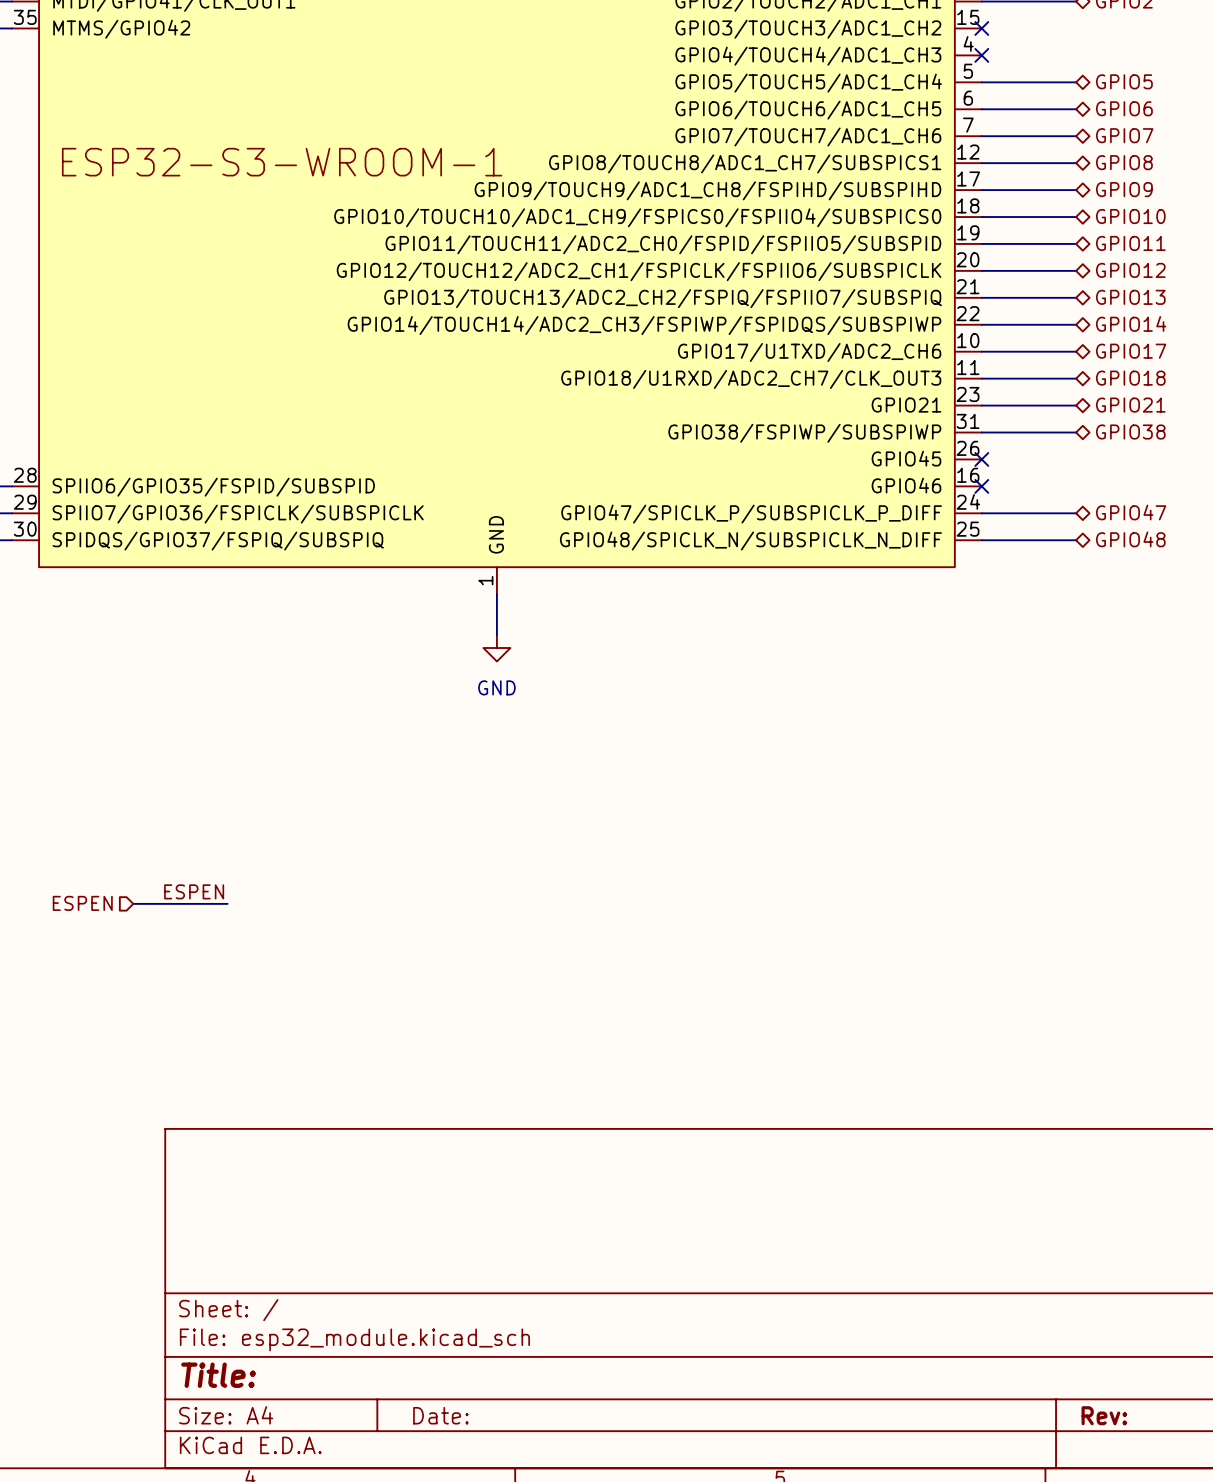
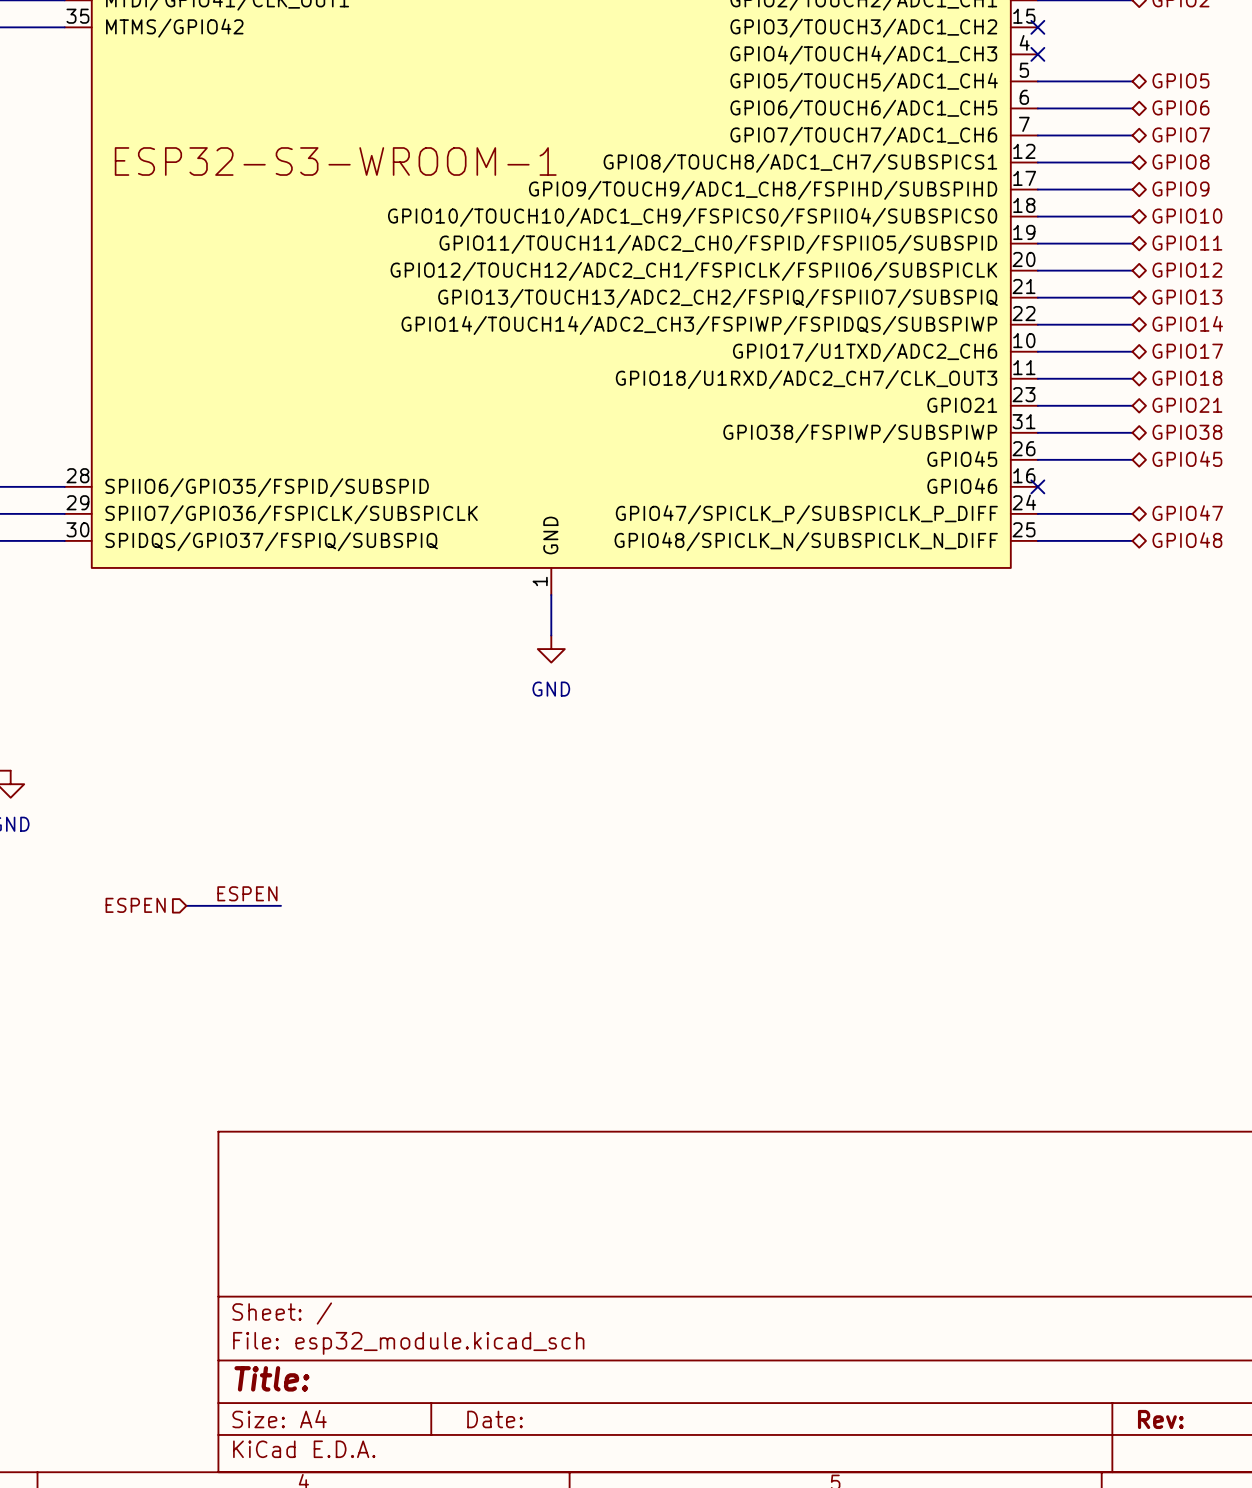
hierarchical label: none -> GPIO45 (1187, 459)
wire: none -> (1037, 459) (1132, 459)
no-connect mark: (981, 459) -> none

